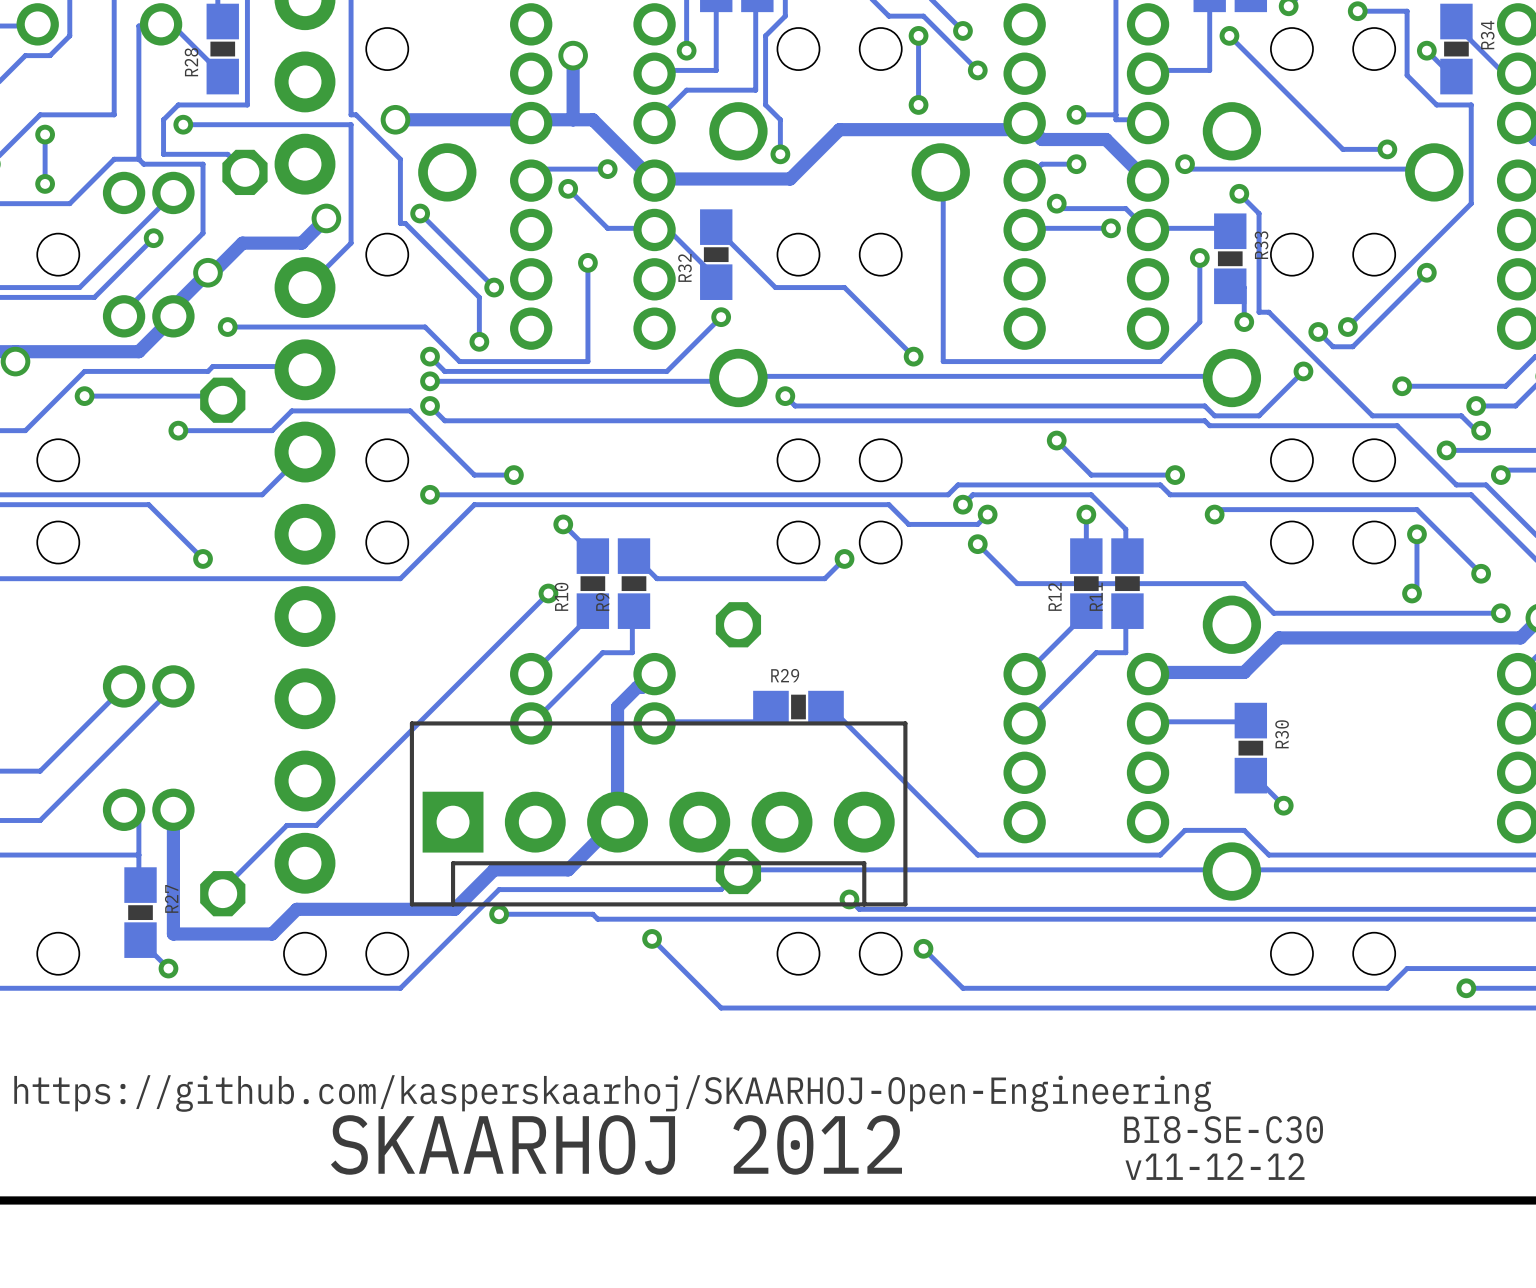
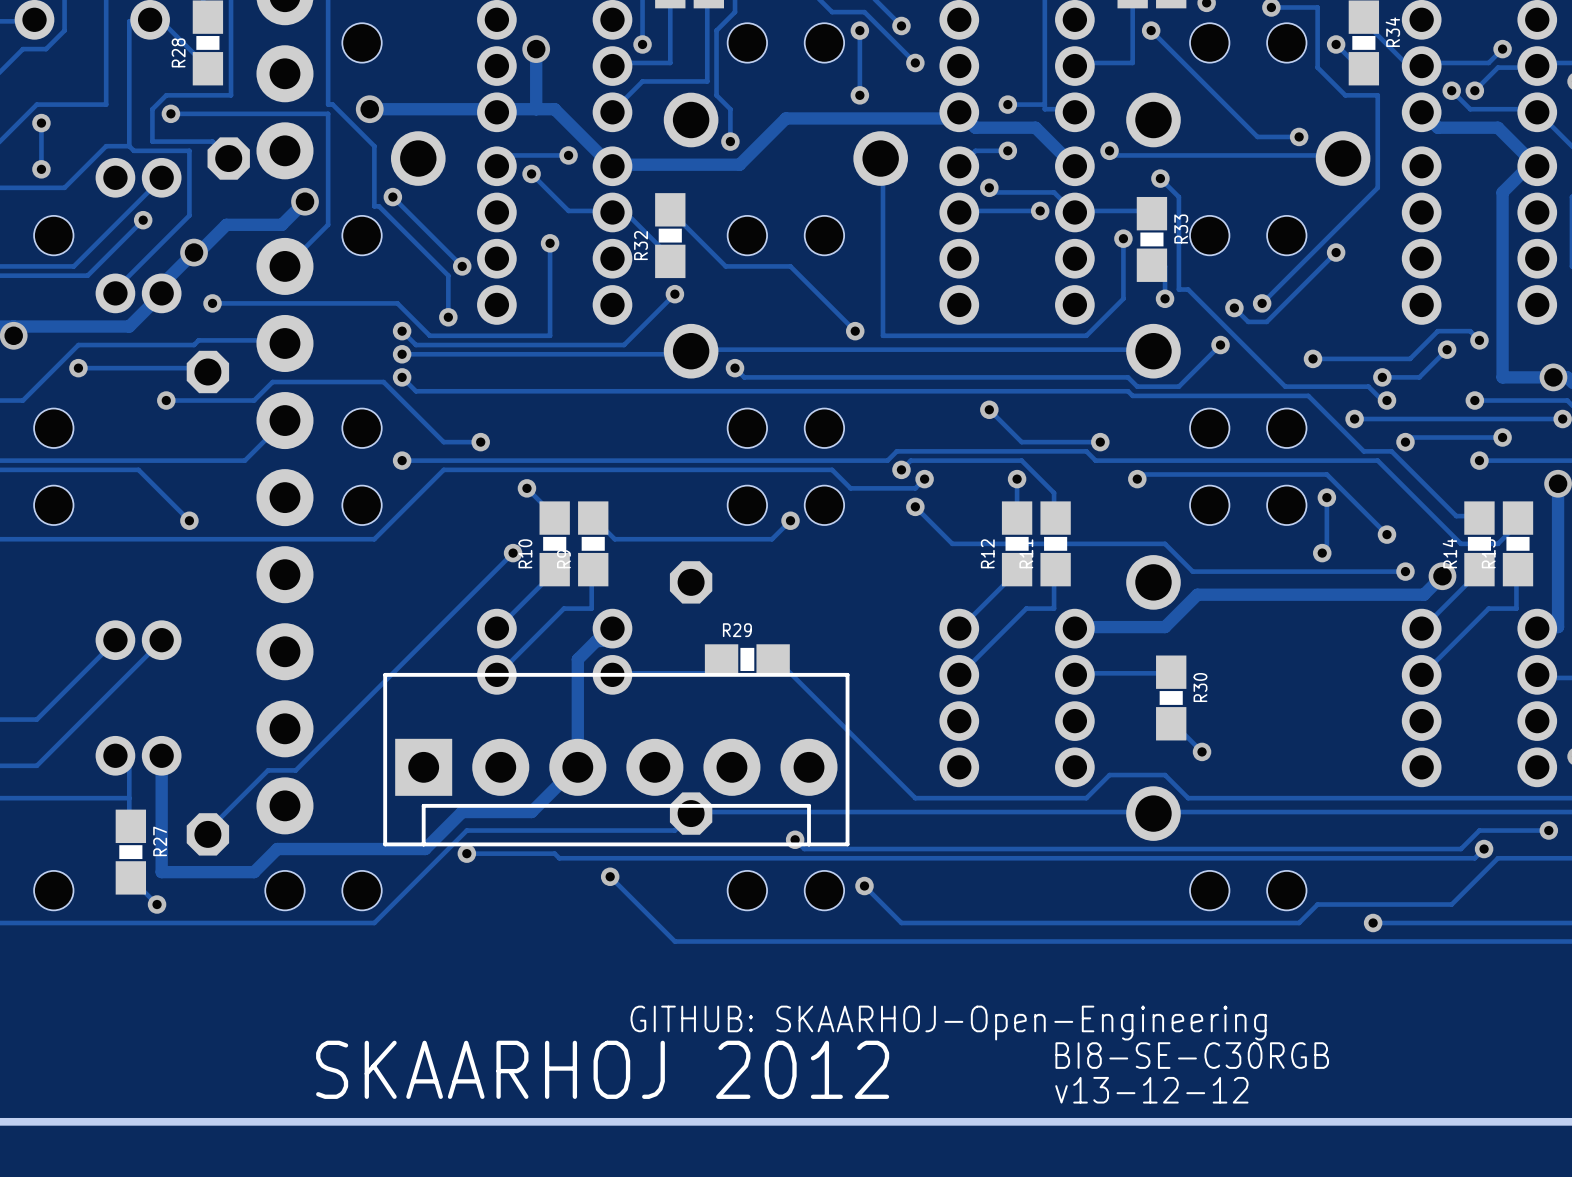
text: https://github.com/kasperskaarhoj/SKAARHOJ-Open-Engineering (612, 1093) -> none
text: none -> GITHUB: SKAARHOJ-Open-Engineering (948, 1023)
text: BI8-SE-C30 (1223, 1129) -> BI8-SE-C30RGB (1192, 1055)
text: v11-12-12 (1214, 1166) -> v13-12-12 (1151, 1090)

